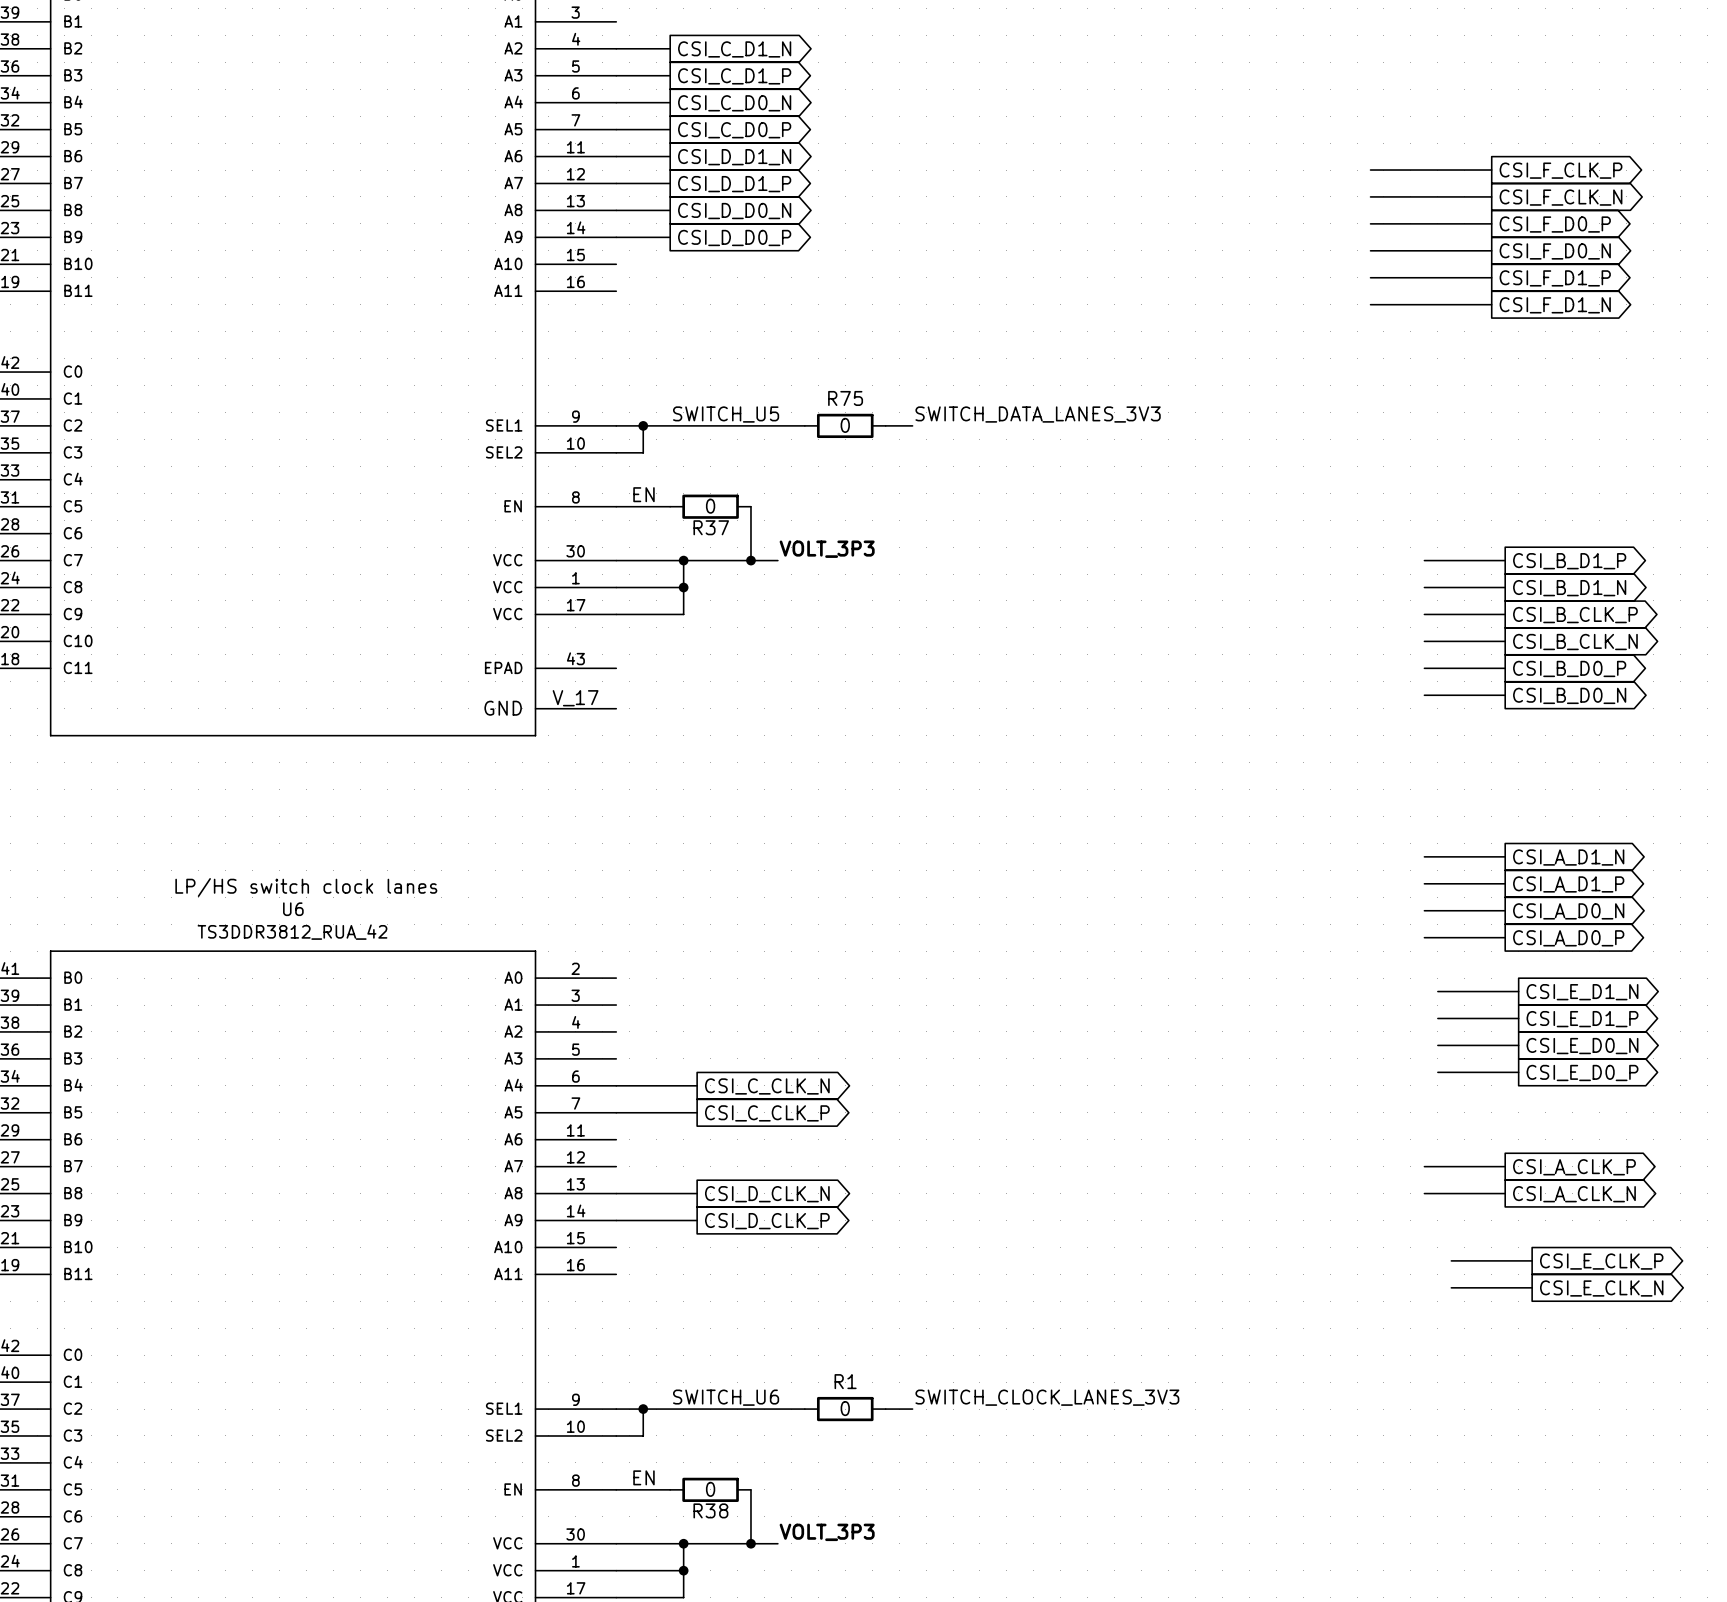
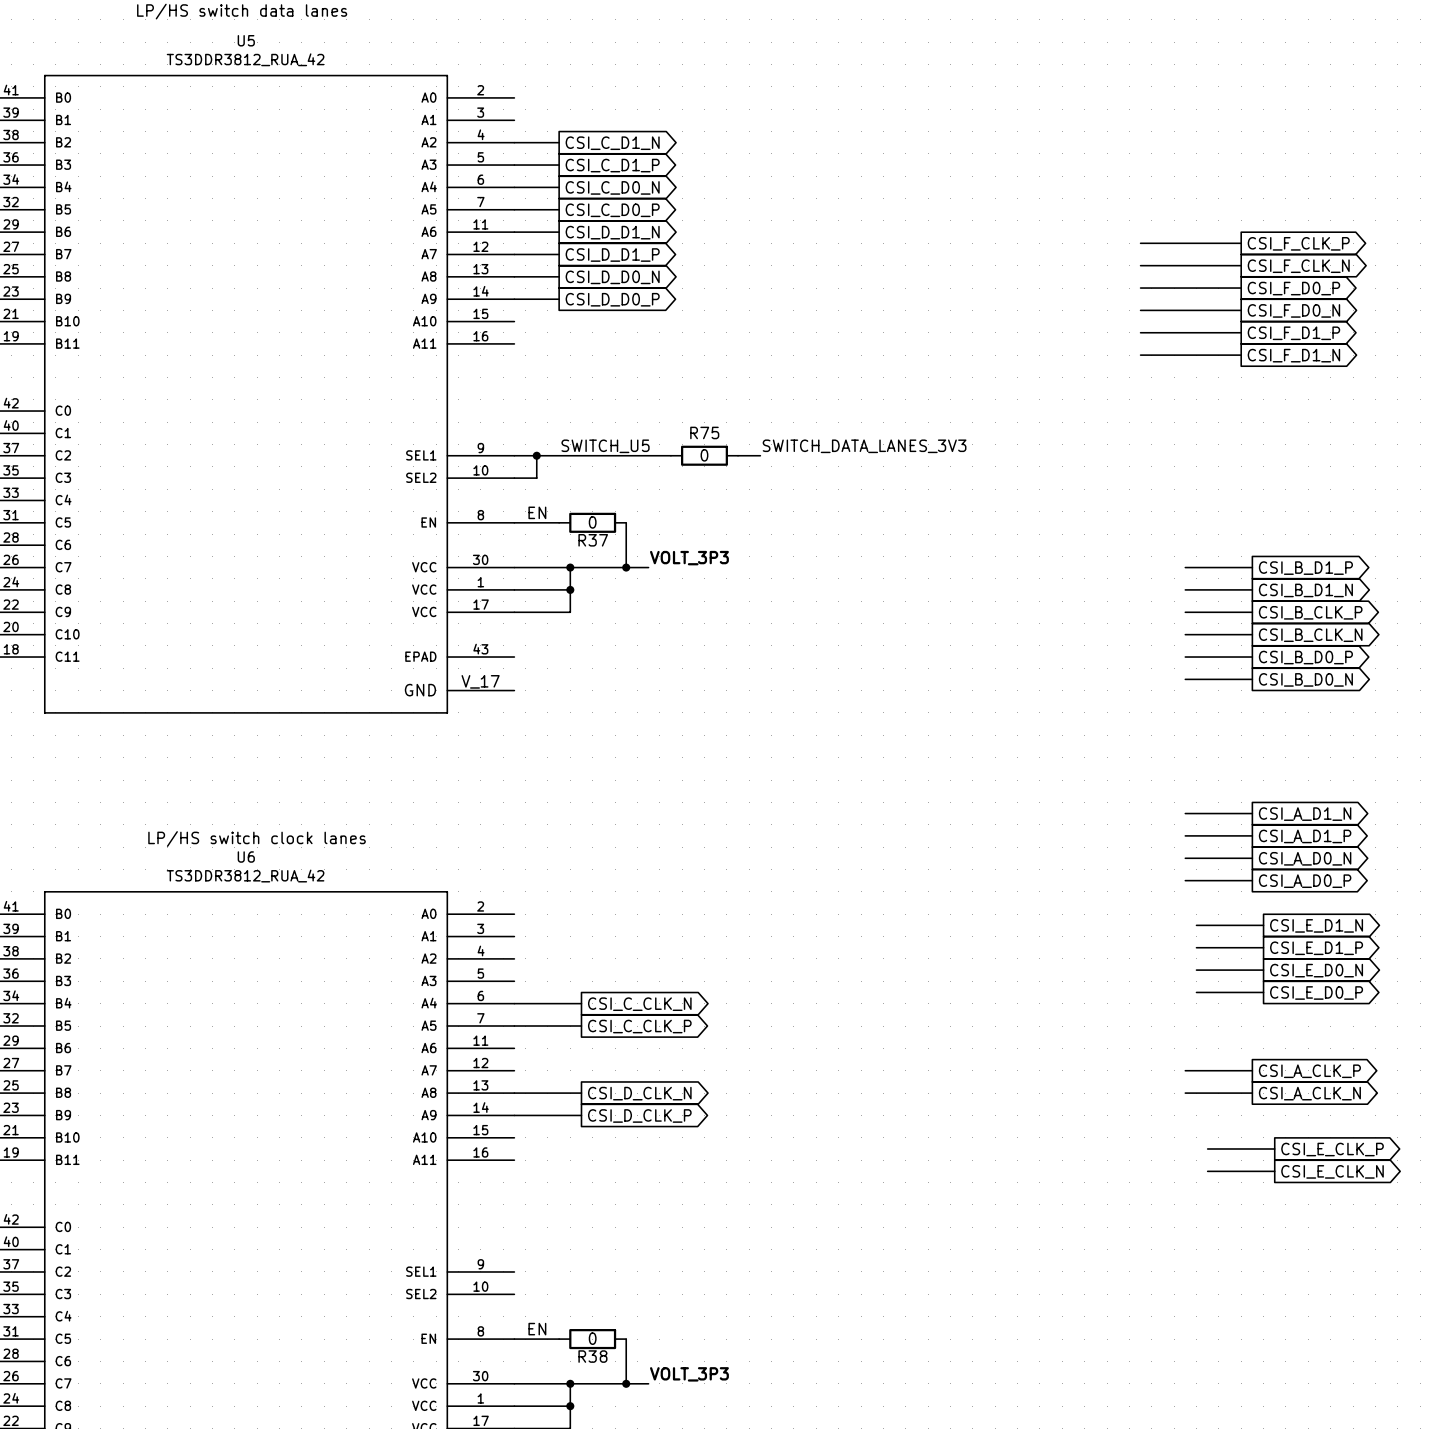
label: SWITCH_U6 (726, 1397) -> none
label: SWITCH_CLOCK_LANES_3V3 (1047, 1397) -> none
wire: (616, 1409) (804, 1409) -> none
wire: (643, 1409) (643, 1435) (616, 1435) -> none
junction: (643, 1409) -> none
R1: 0 (845, 1409) -> none
wire: (885, 1409) (912, 1409) -> none

